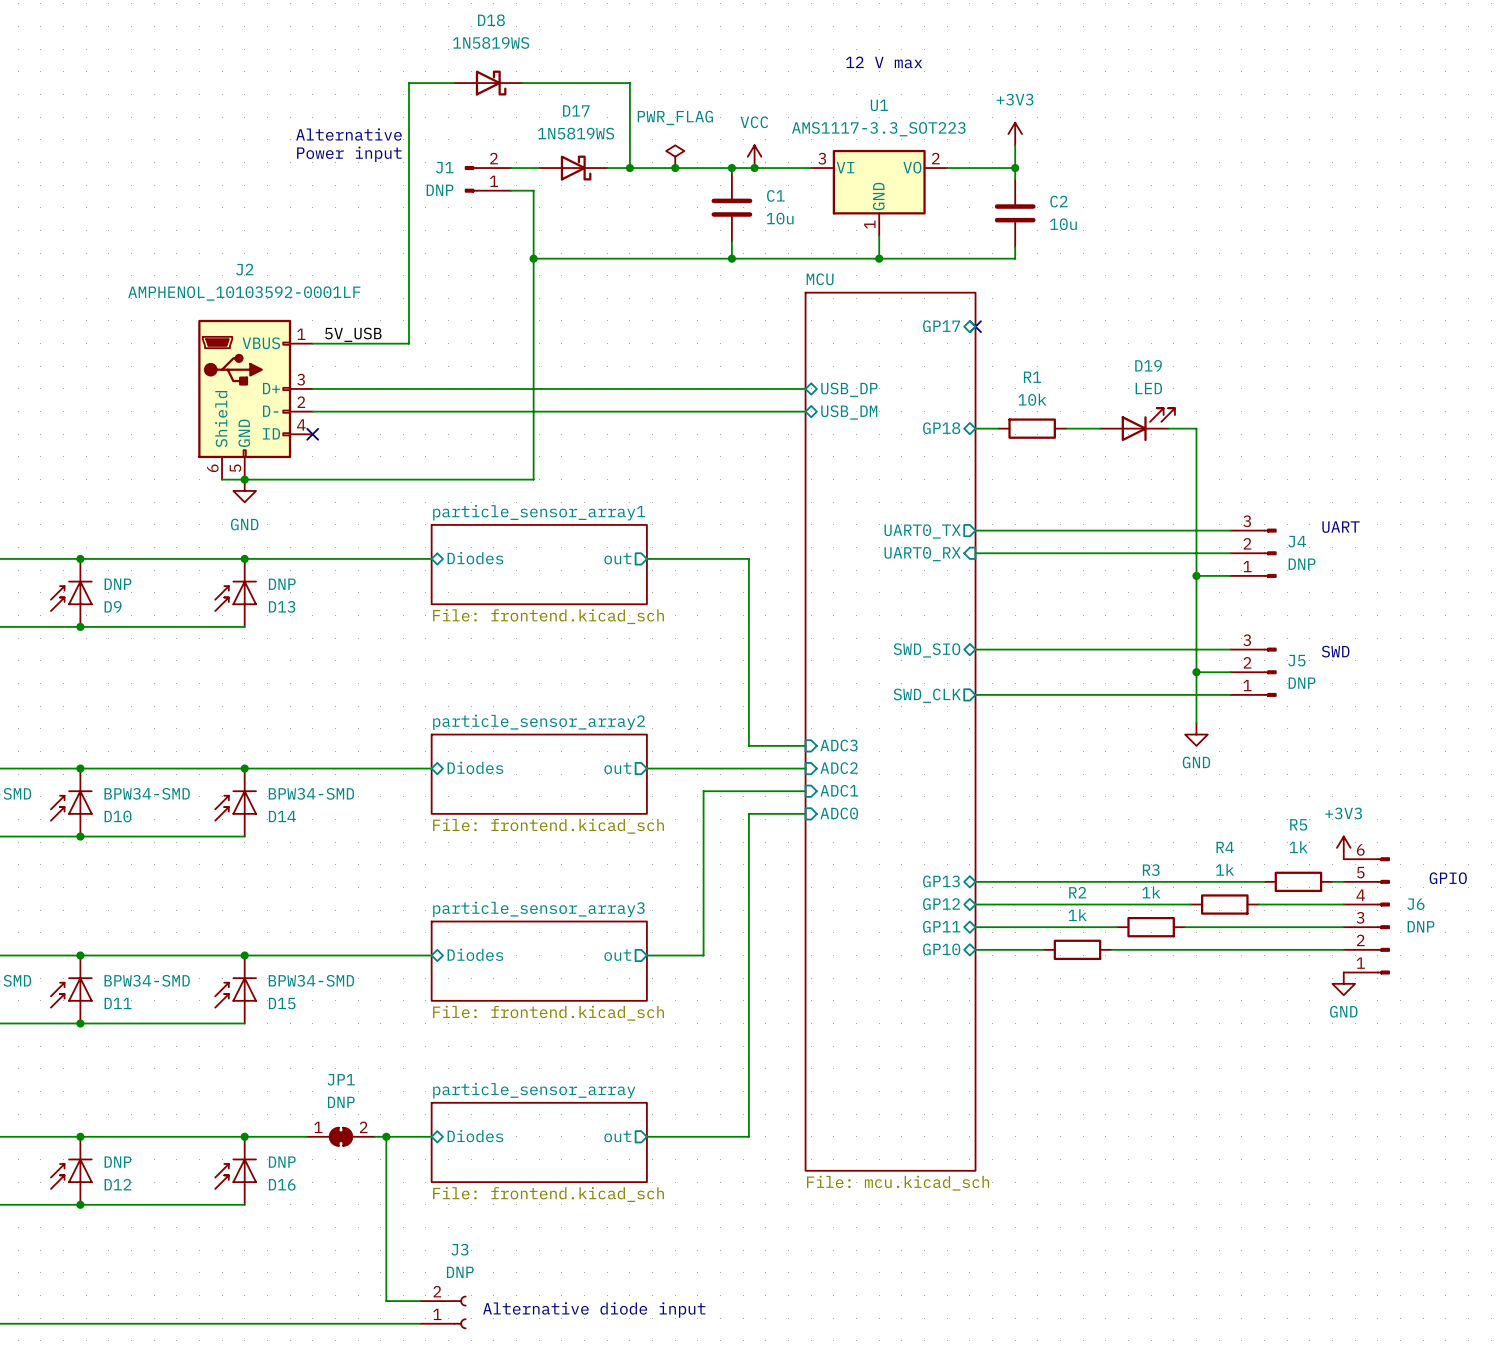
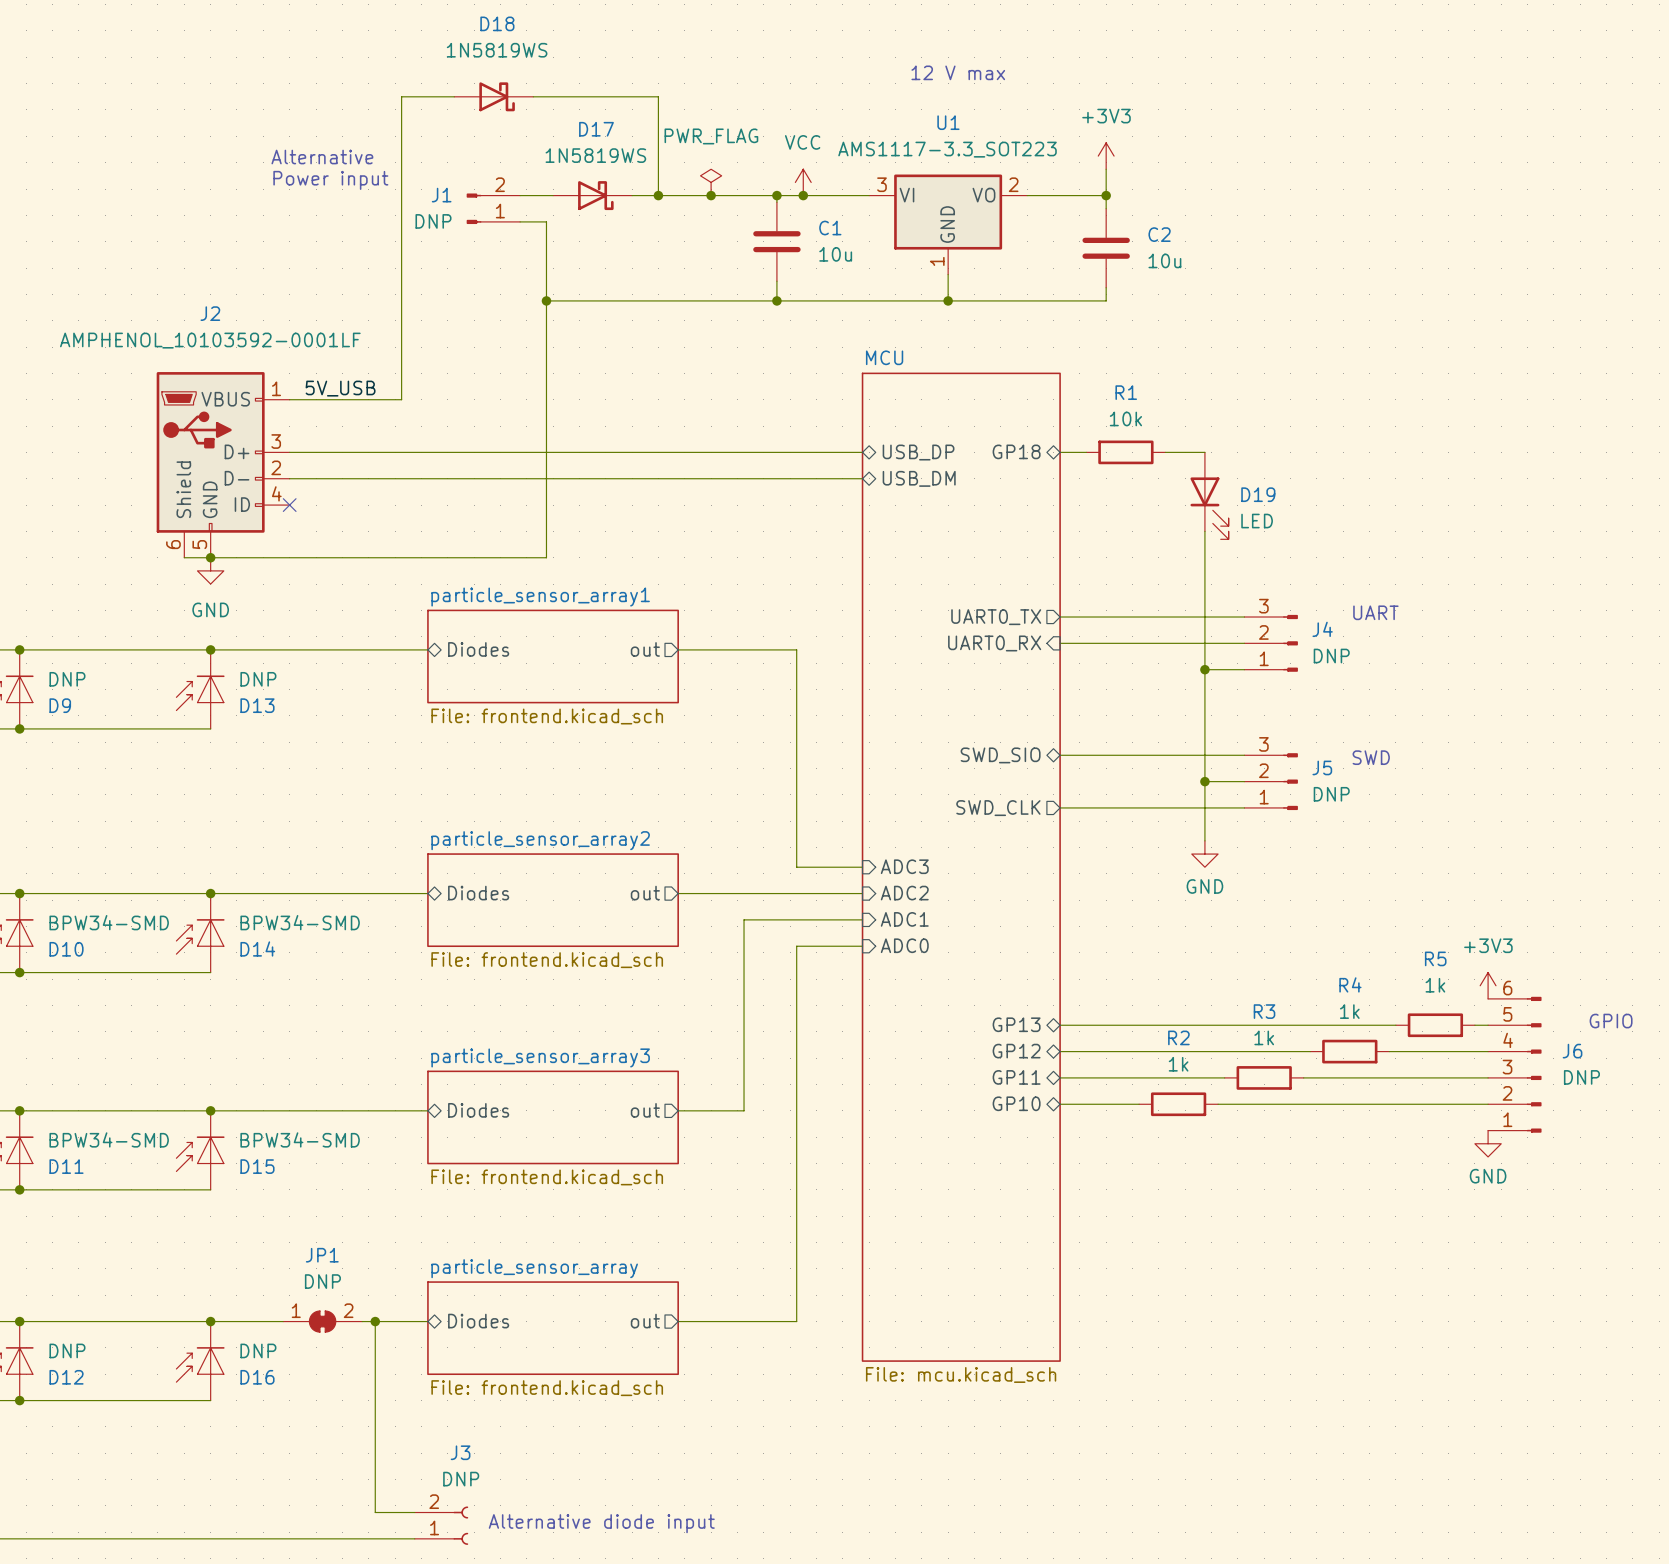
sheet pin: GP17 (941, 326) -> none
no-connect mark: (975, 326) -> none
D19 name position: D19 (1148, 365) -> D19 (1258, 494)
D19 rotation: 0° (1148, 424) -> 90° clockwise (1209, 508)
sheet pin position: GP18 (941, 428) -> GP18 (1016, 451)
wire: (975, 428) (998, 428) -> (1060, 452) (1086, 452)
R1 position: (1032, 428) -> (1125, 452)
wire: (1066, 428) (1100, 428) -> (1165, 452) (1204, 452)
wire: (1168, 428) (1196, 428) (1196, 723) -> none
wire: none -> (1204, 531) (1204, 840)
text position: UART (1341, 527) -> UART (1375, 612)
wire: (1134, 530) (1230, 530) -> none
wire: (1134, 553) (1230, 553) -> none
J4 position: (1253, 553) -> (1271, 643)
junction: none -> (1204, 669)
wire: (1196, 575) (1230, 575) -> (1204, 669) (1244, 669)
junction: (1196, 575) -> none
wire: (1134, 649) (1230, 649) -> none
text position: SWD (1335, 651) -> SWD (1371, 757)
junction: none -> (1204, 781)
wire: (1196, 672) (1230, 672) -> (1204, 781) (1244, 781)
junction: (1196, 672) -> none
J5 position: (1253, 672) -> (1271, 781)
wire: (1134, 694) (1230, 694) -> none
sheet MCU: File: mcu.kicad_sch (890, 731) -> none
power symbol position: GND (1196, 734) -> GND (1204, 854)
sheet MCU: none -> File: mcu.kicad_sch (961, 867)

